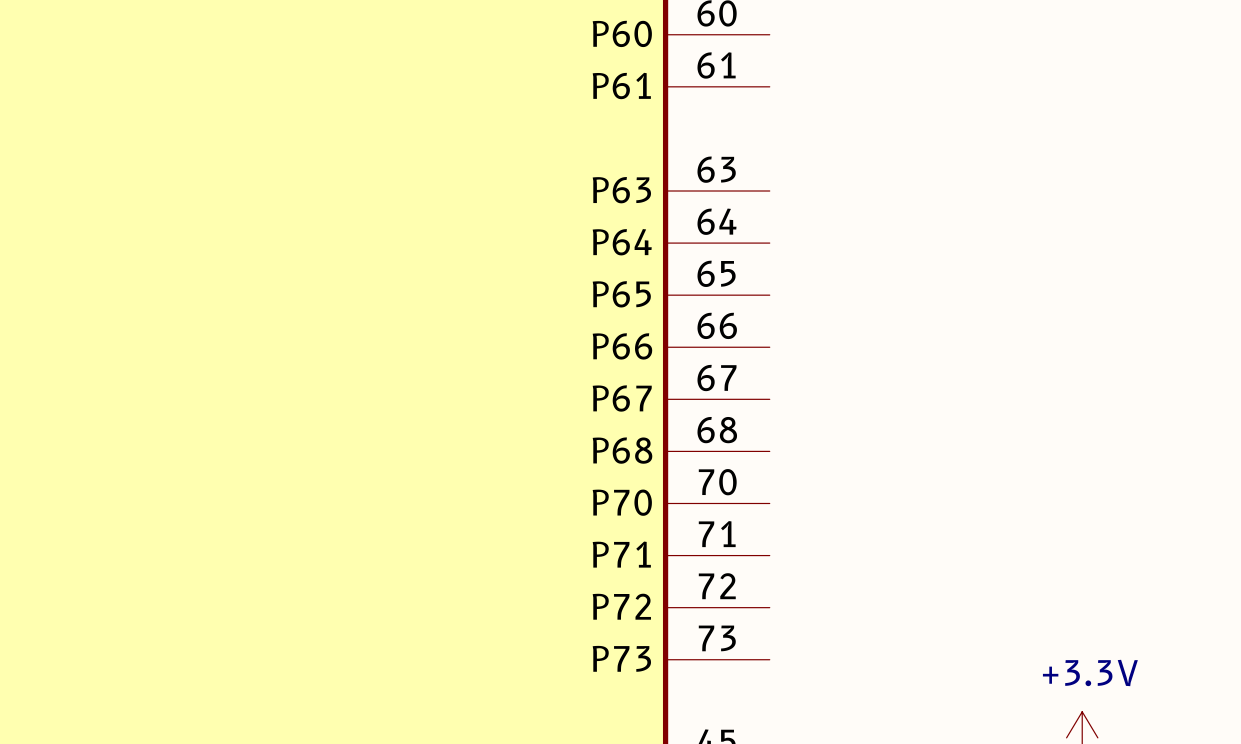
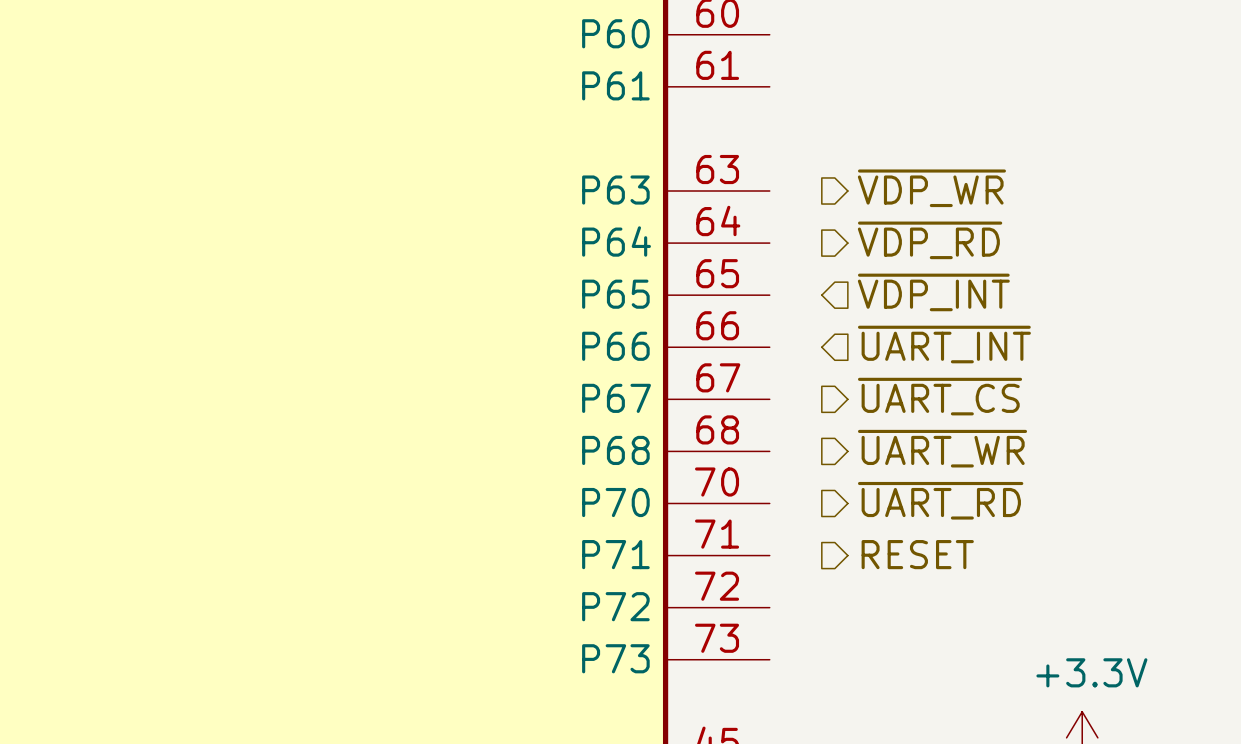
hierarchical label: none -> ~{VDP_WR} (931, 188)
hierarchical label: none -> ~{VDP_RD} (930, 240)
hierarchical label: none -> ~{VDP_INT} (933, 292)
hierarchical label: none -> ~{UART_INT} (944, 344)
hierarchical label: none -> ~{UART_CS} (940, 396)
hierarchical label: none -> ~{UART_WR} (942, 448)
hierarchical label: none -> ~{UART_RD} (940, 500)
hierarchical label: none -> RESET (917, 554)

